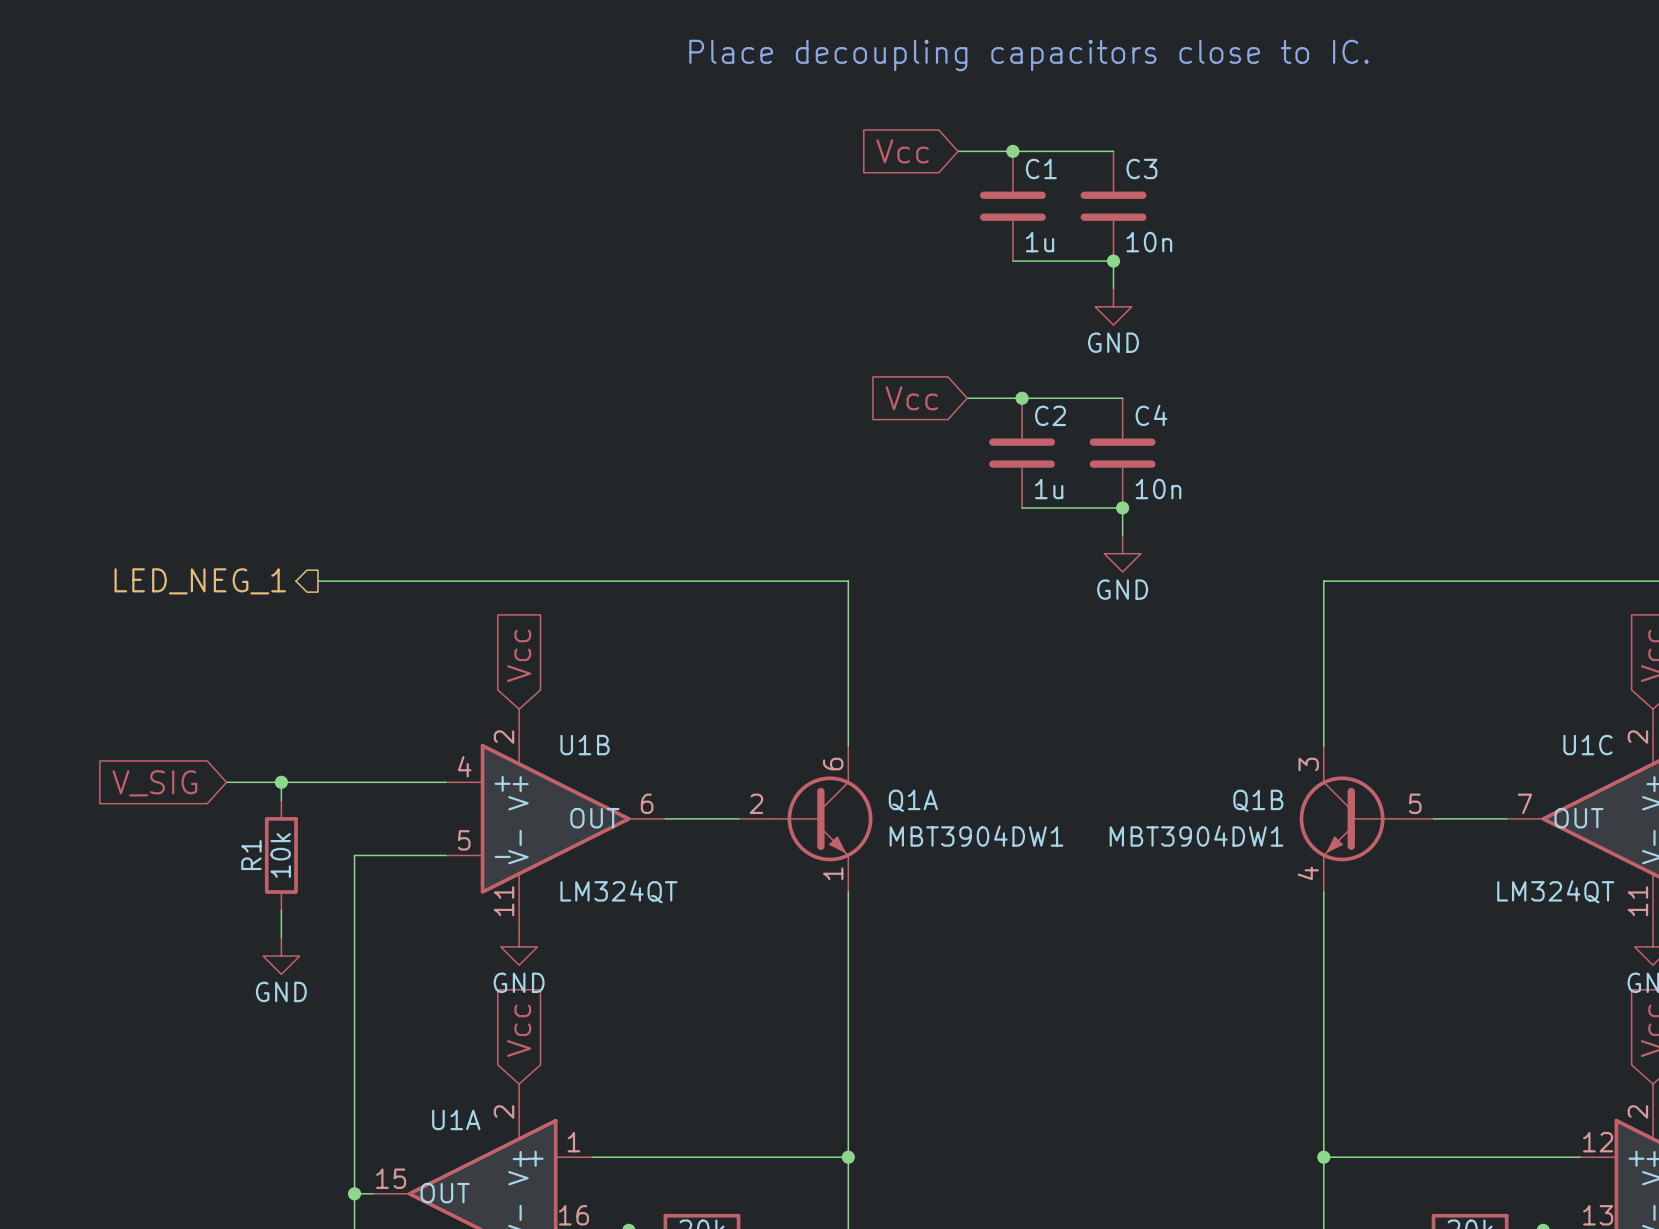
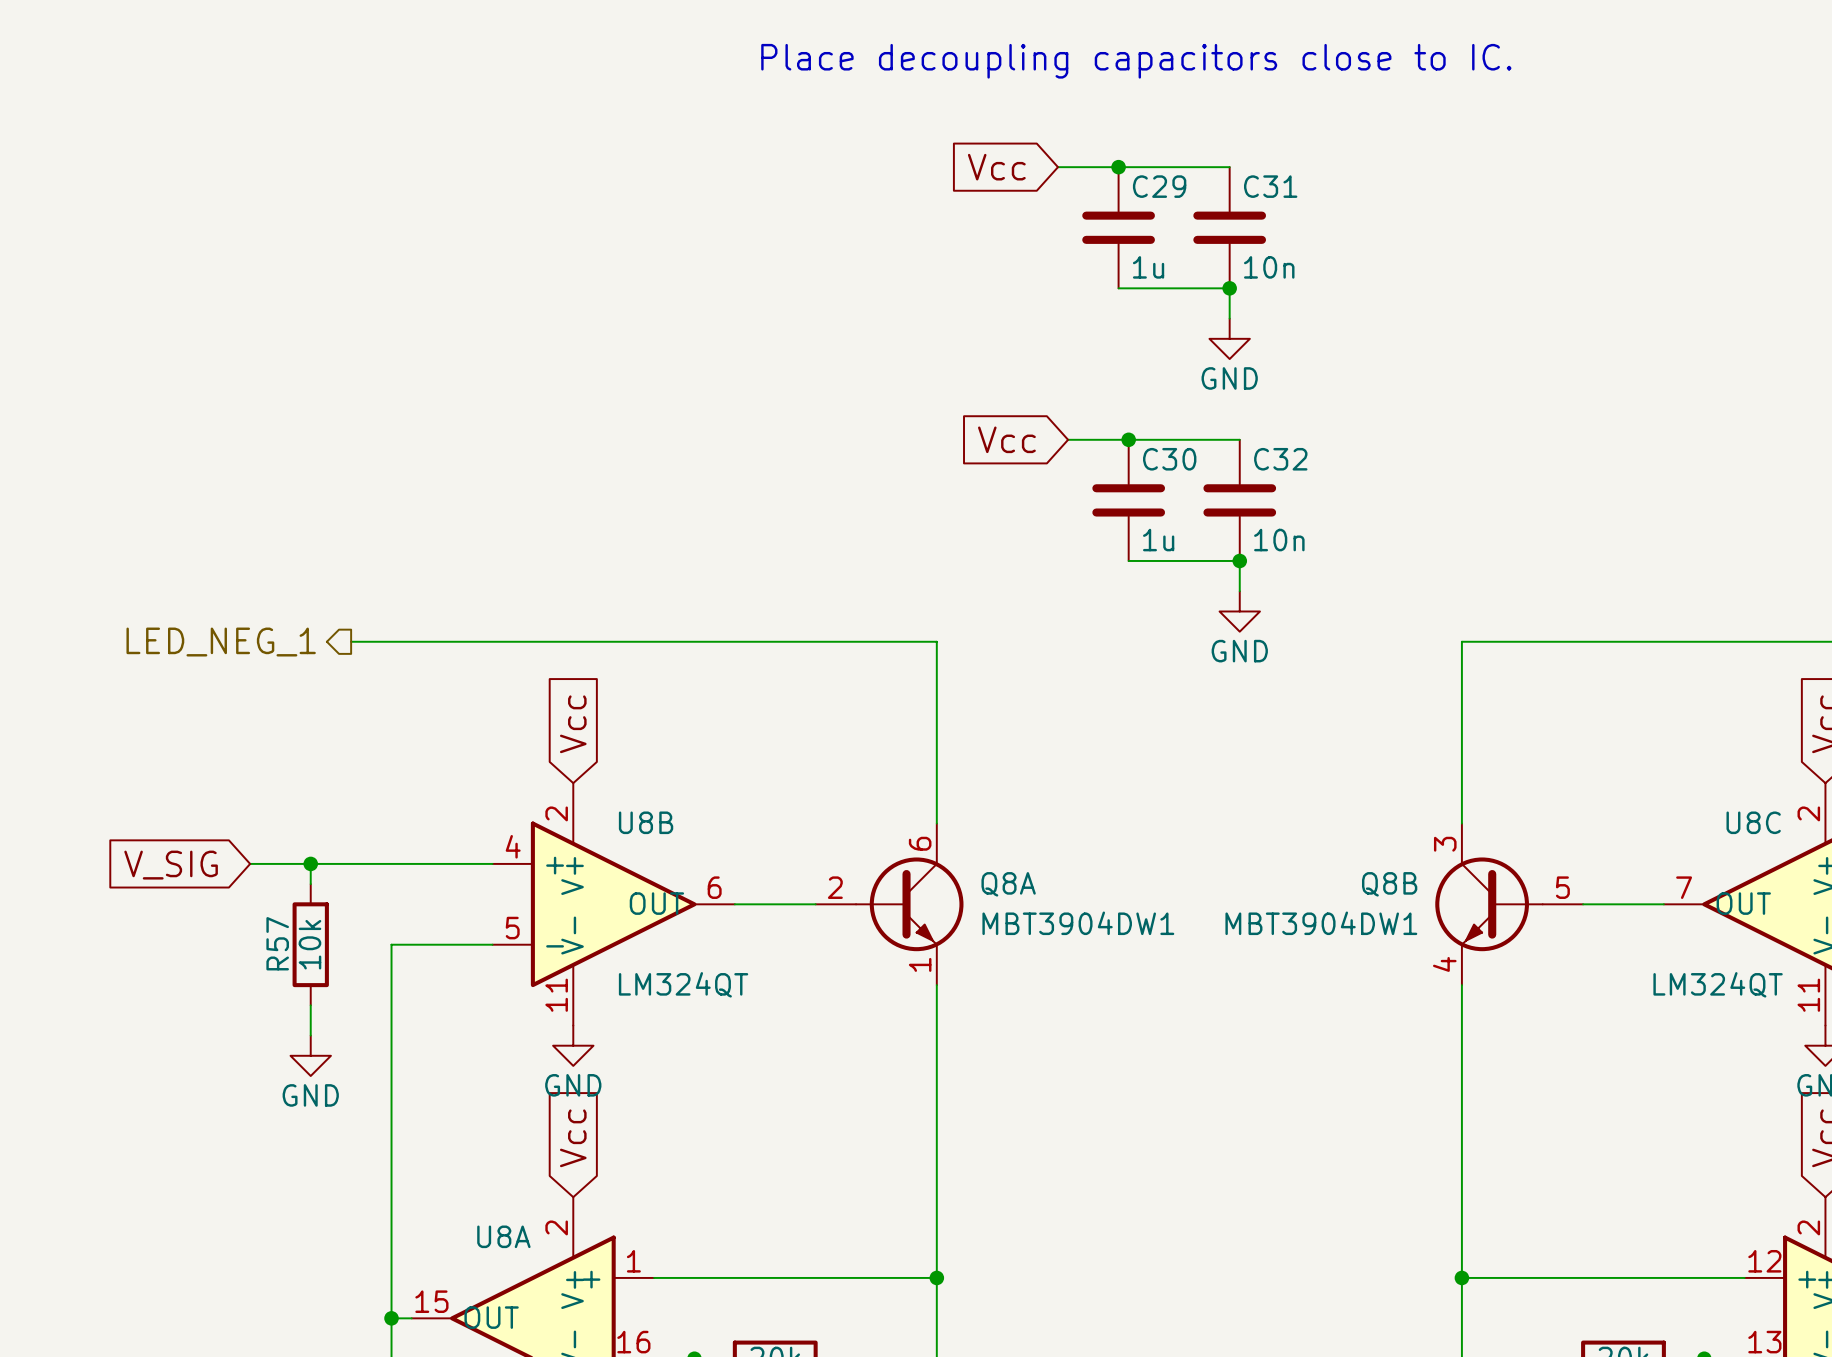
C1 name: C1 (1041, 168) -> C29 (1159, 186)
C3 name: C3 (1141, 168) -> C31 (1270, 186)
C2 name: C2 (1050, 415) -> C30 (1169, 459)
C4 name: C4 (1151, 415) -> C32 (1280, 459)
U1B name: U1B (585, 745) -> U8B (646, 822)
U1C name: U1C (1587, 745) -> U8C (1753, 822)
Q1A name: Q1A (913, 800) -> Q8A (1008, 884)
Q1B name: Q1B (1258, 800) -> Q8B (1389, 884)
R1 name: R1 (251, 855) -> R57 (277, 943)
U1A name: U1A (456, 1119) -> U8A (503, 1236)

